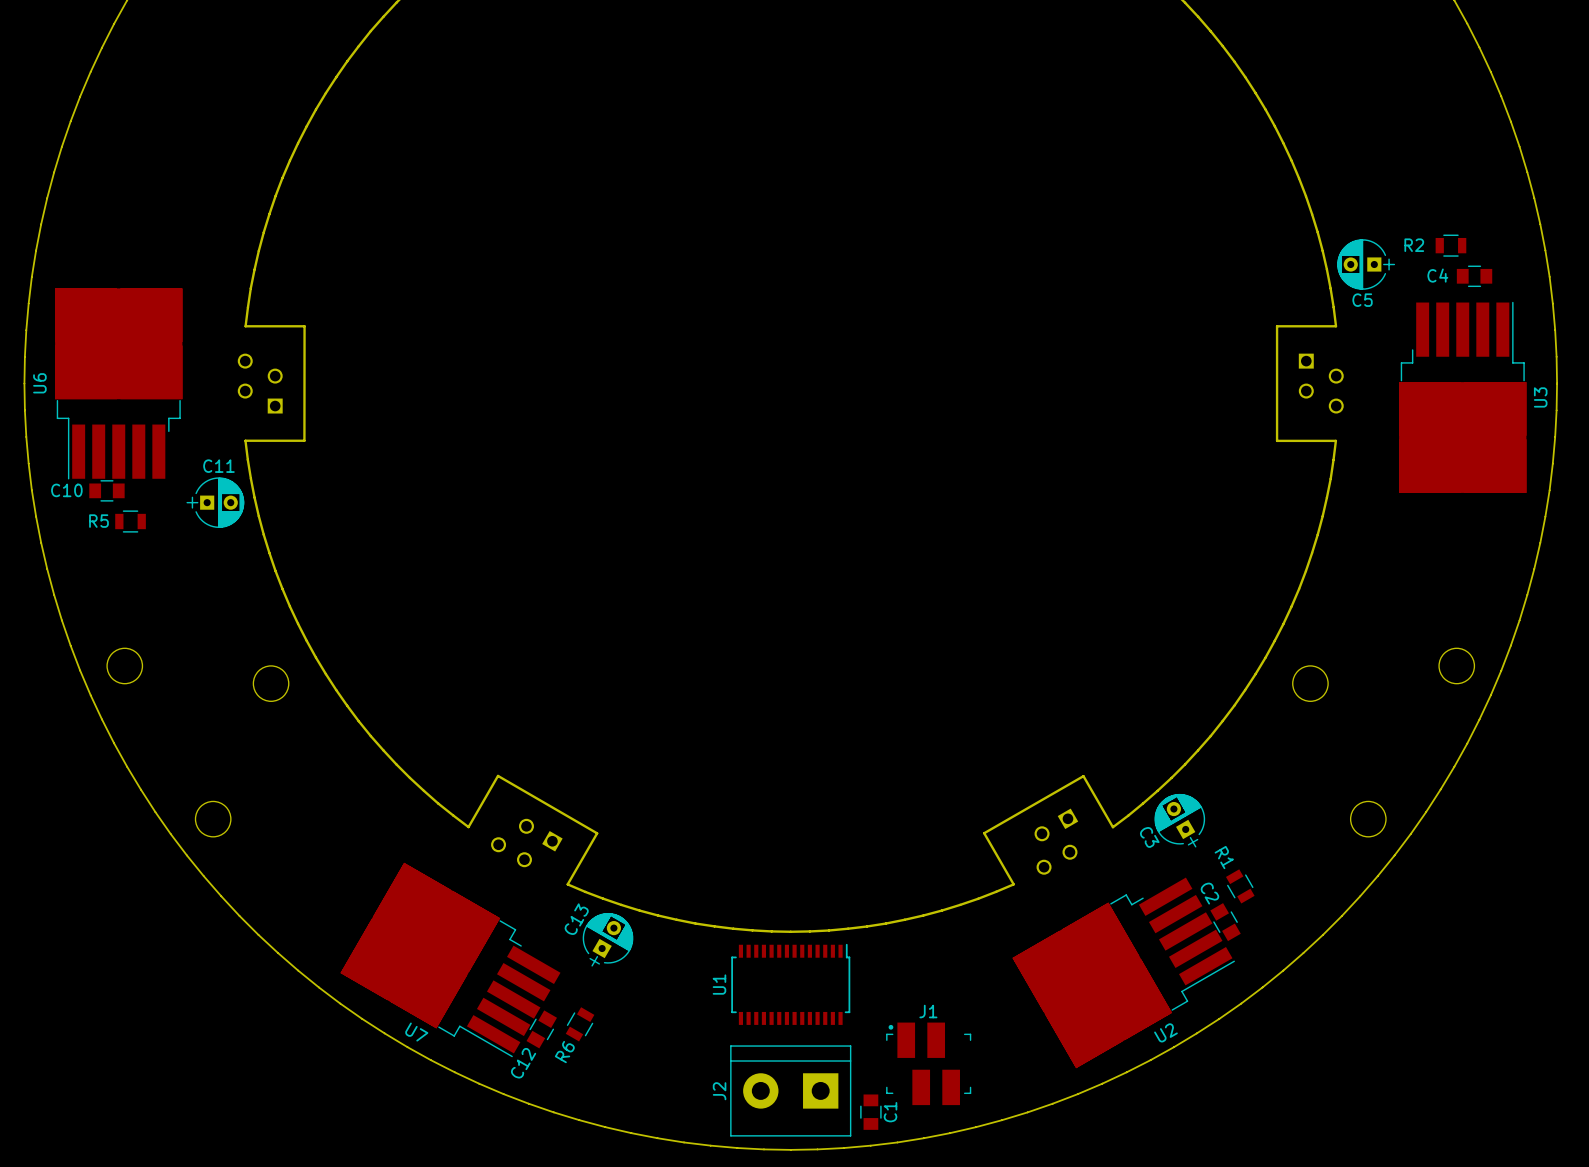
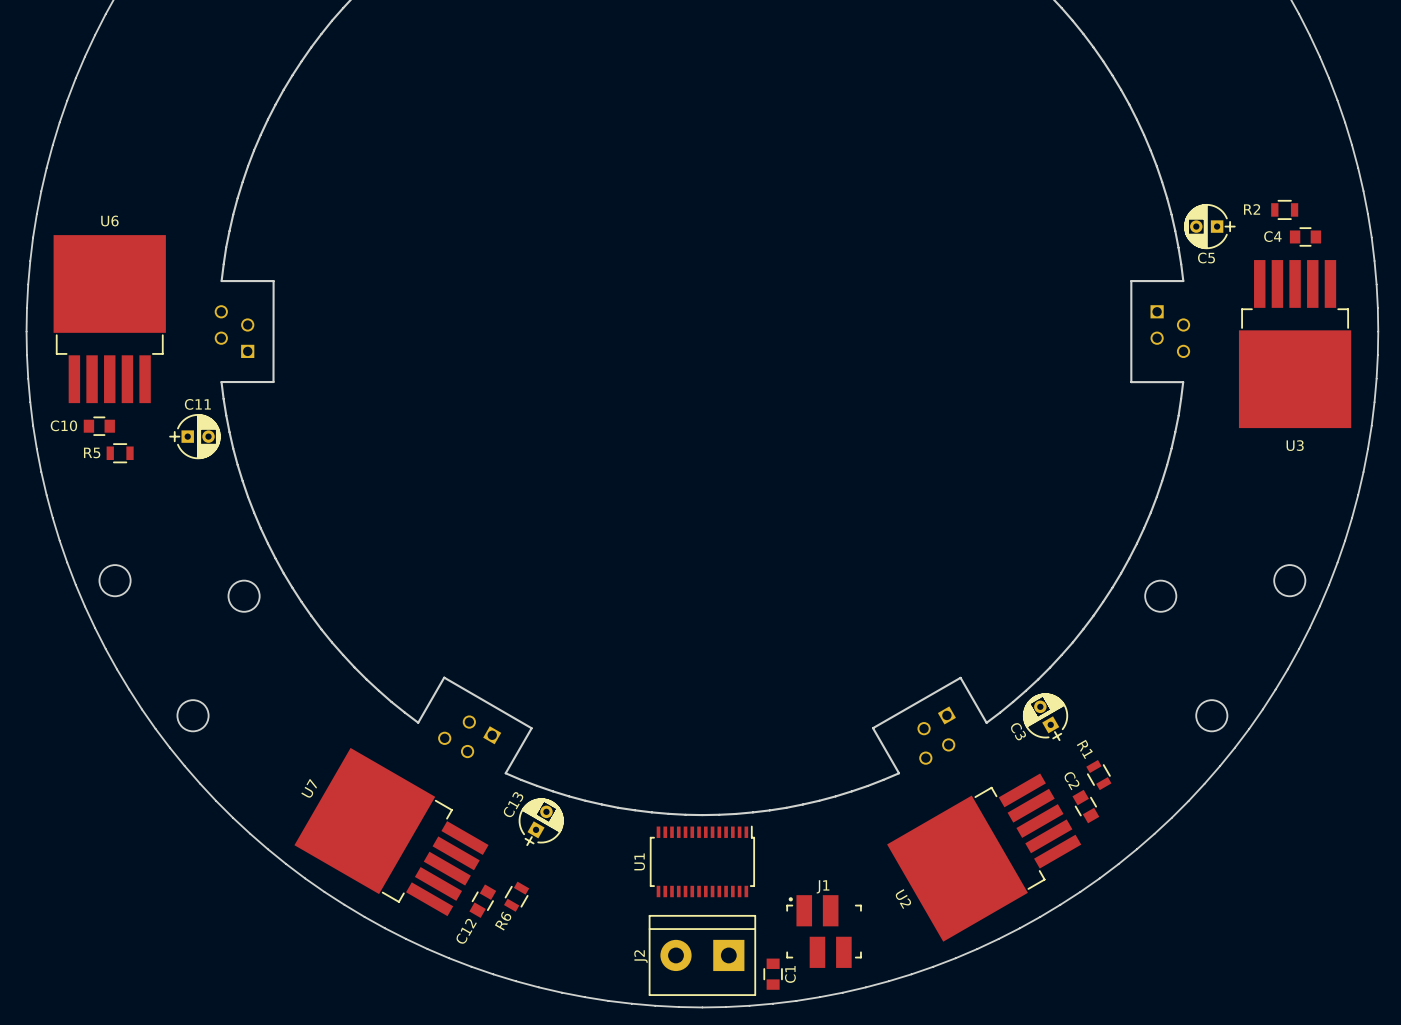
U6 footprint: [55, 288, 183, 480] -> [53, 235, 166, 404]
U3 footprint: [1399, 301, 1527, 493] -> [1238, 260, 1352, 429]
U6 name position: U6 (39, 383) -> U6 (109, 220)
U3 name position: U3 (1540, 397) -> U3 (1295, 445)
U7 footprint: [340, 862, 561, 1058] -> [294, 747, 489, 917]
U2 footprint: [1012, 877, 1235, 1069] -> [887, 773, 1082, 942]
U7 name position: U7 (416, 1032) -> U7 (309, 788)
U2 name position: U2 (1165, 1032) -> U2 (903, 899)

